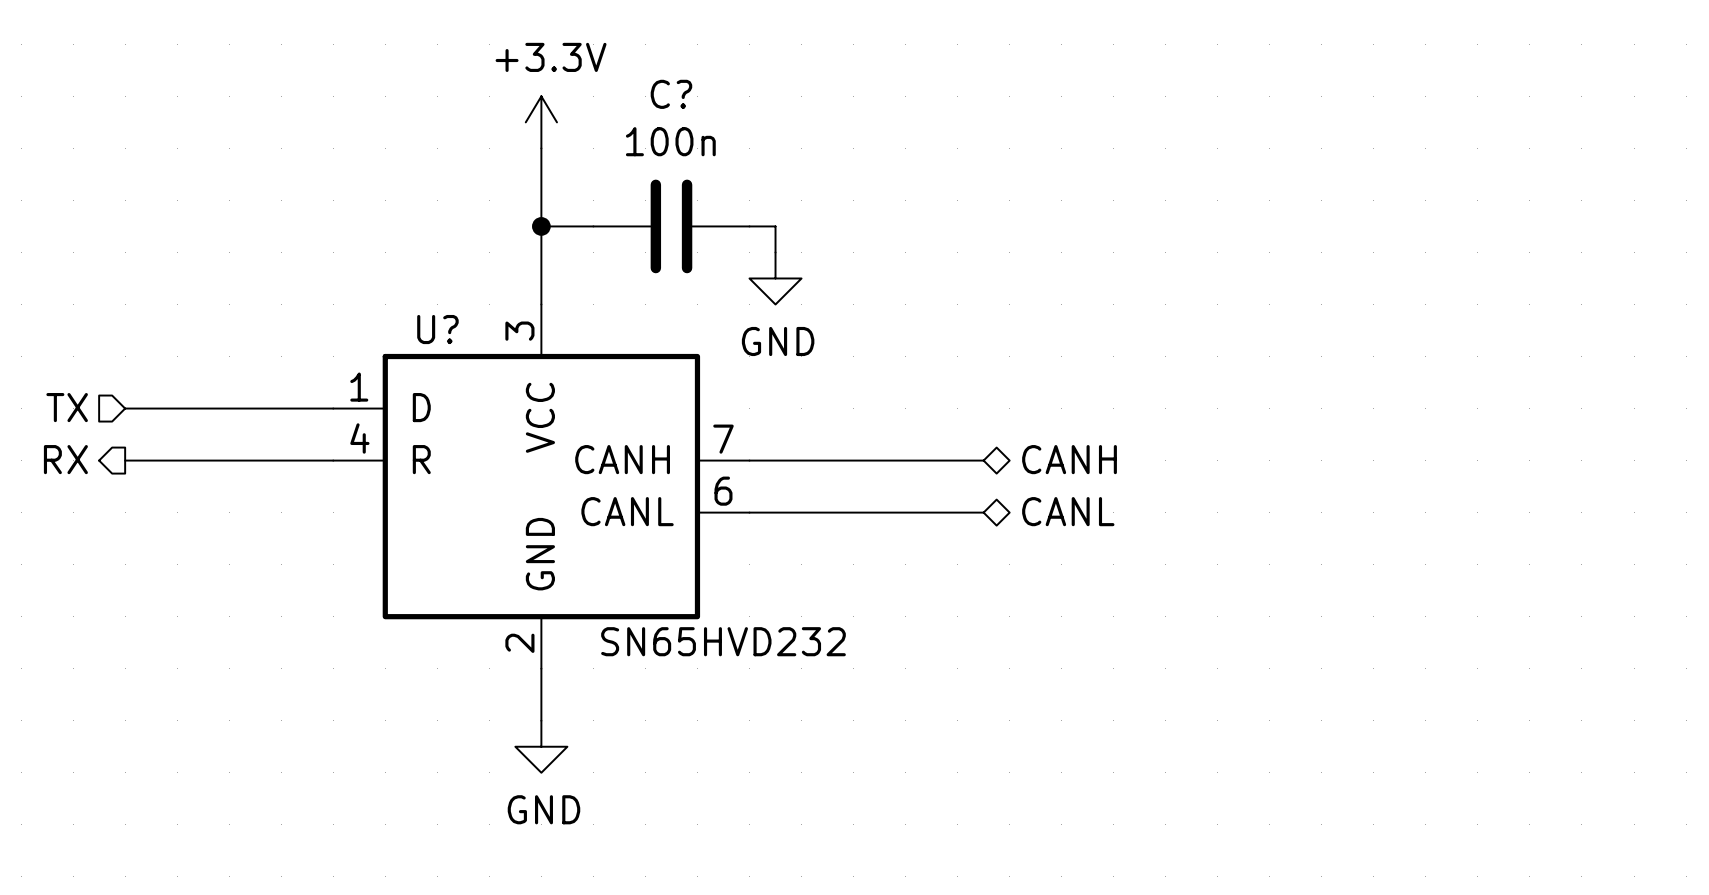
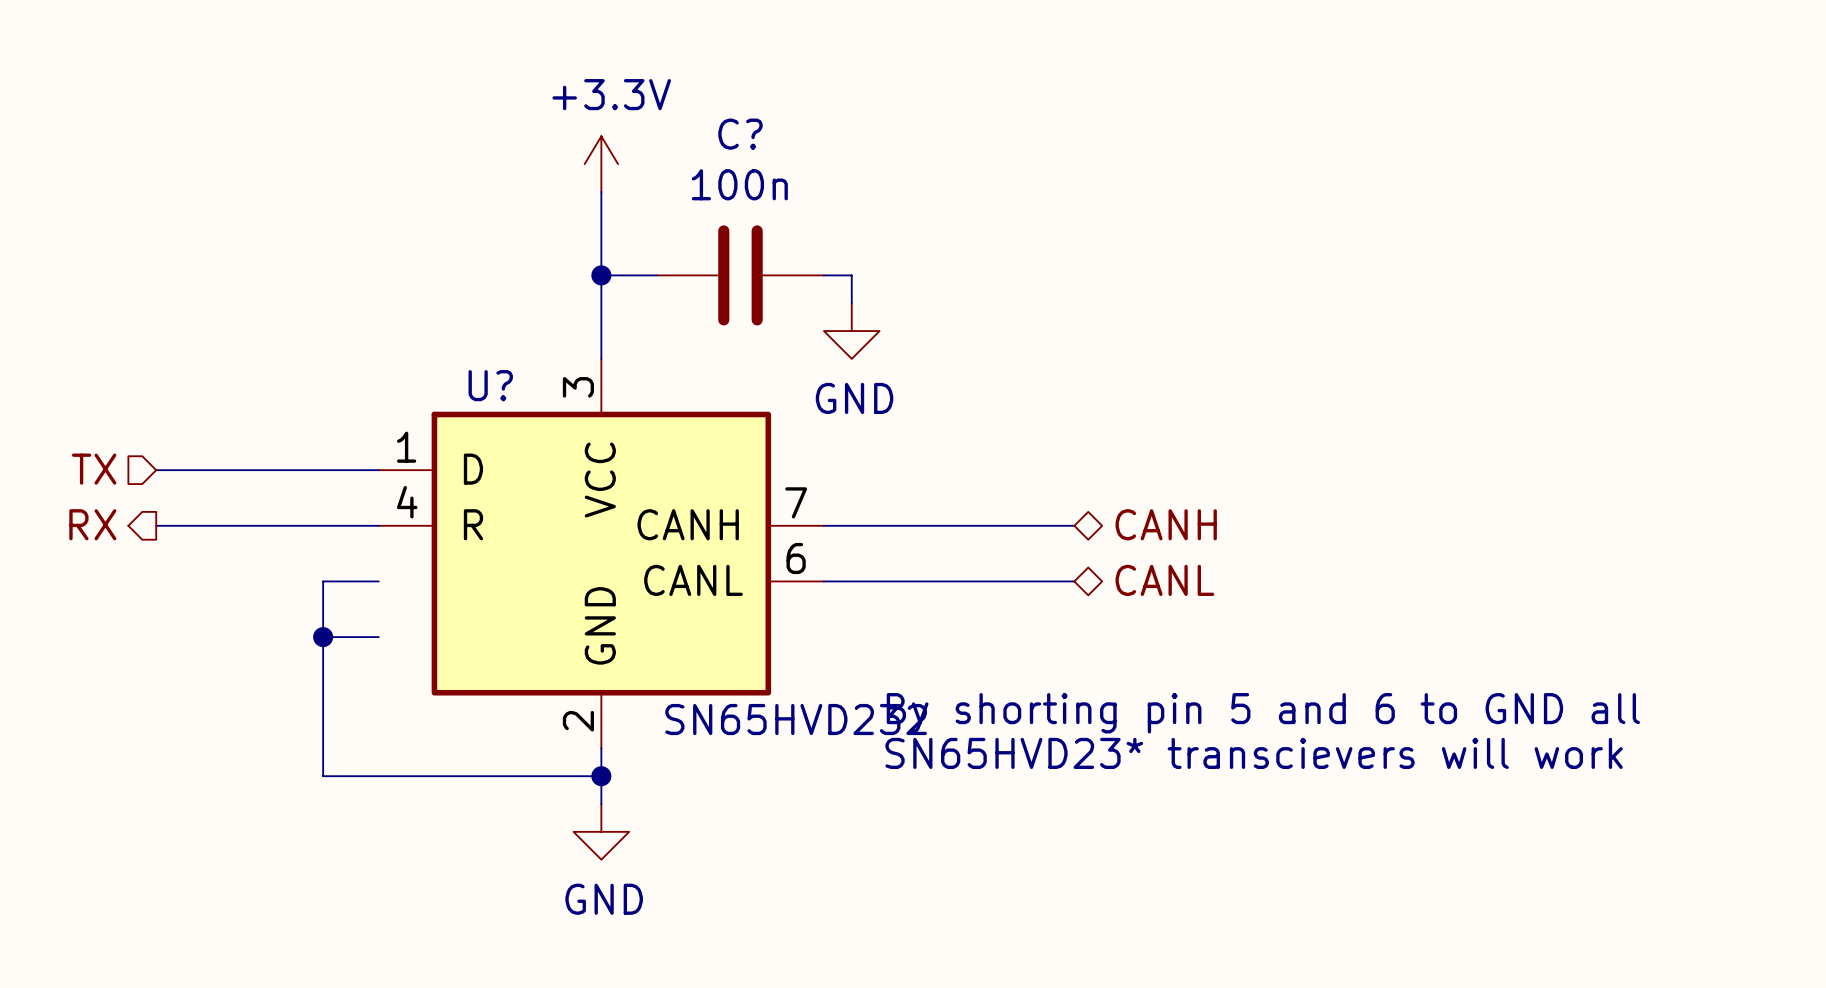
wire: none -> (378, 581) (323, 581) (323, 776) (601, 776)
wire: none -> (323, 637) (378, 637)
junction: none -> (323, 637)
text: none -> By shorting pin 5 and 6 to GND all (1263, 713)
text: none -> SN65HVD23* transcievers will work (1254, 753)
junction: none -> (601, 776)

